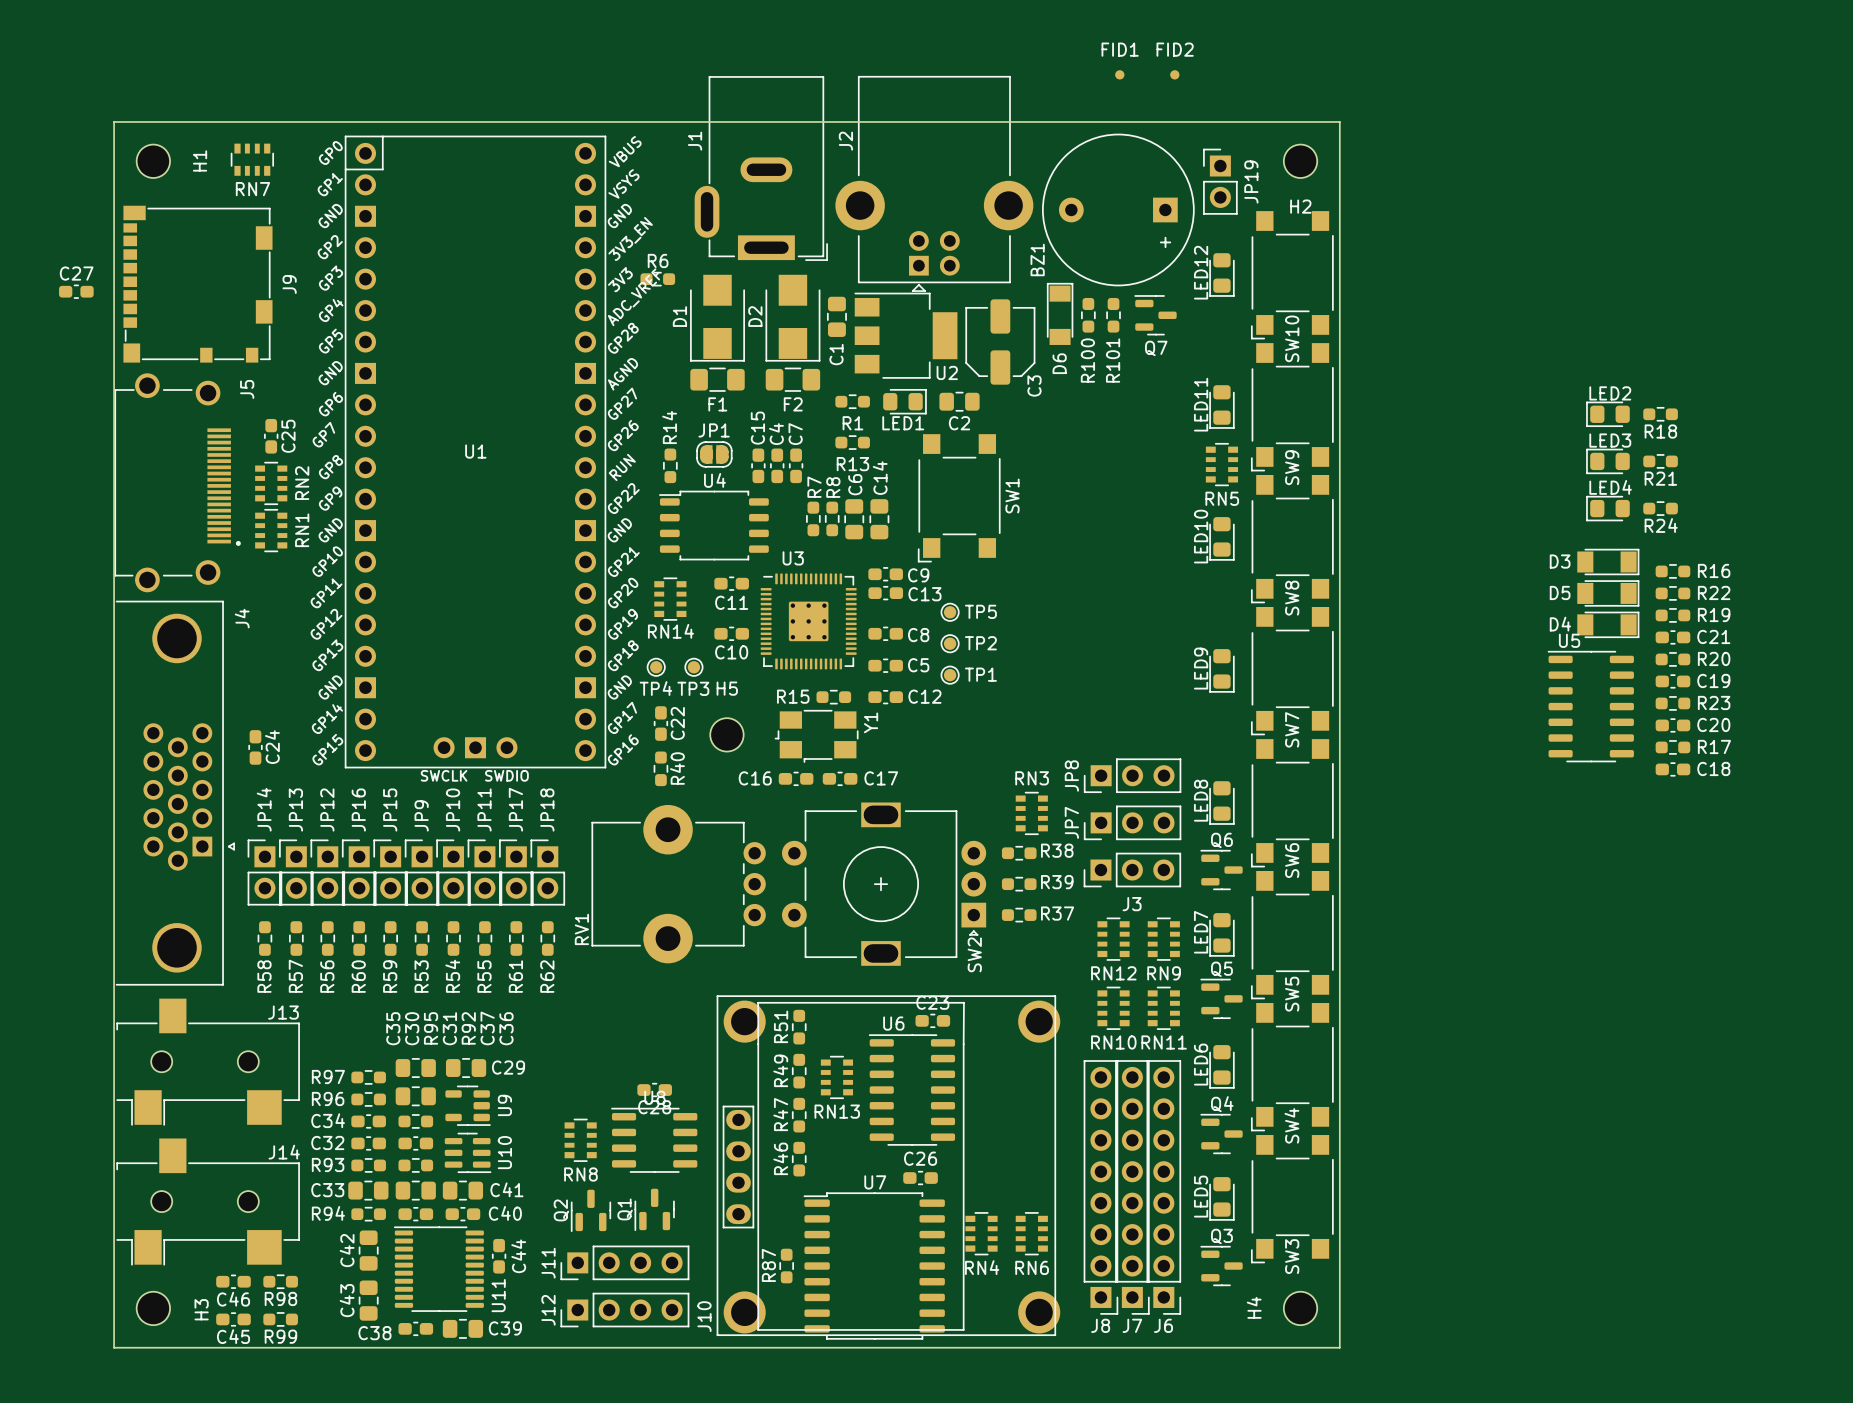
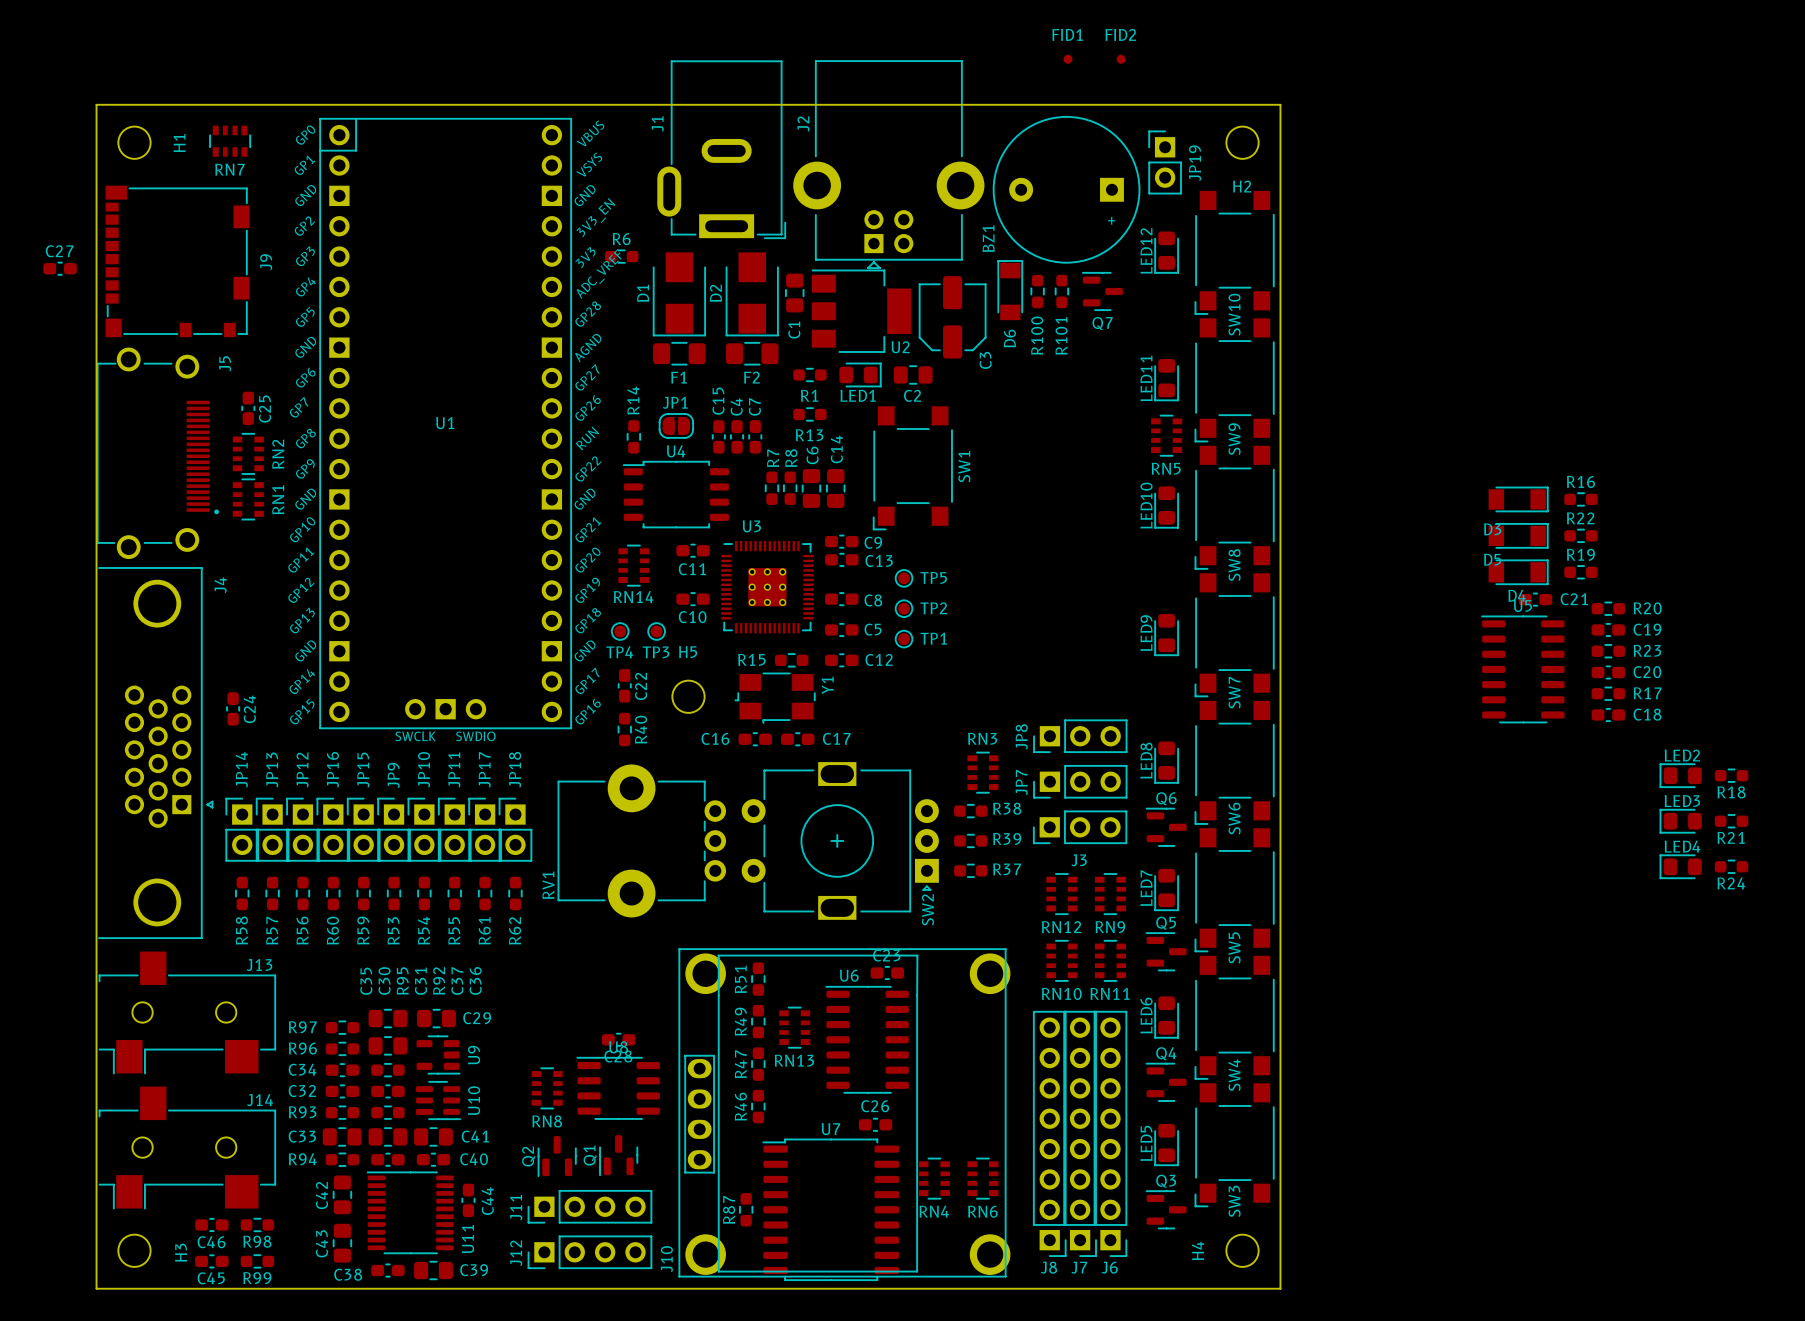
LED2 position: (1608, 414) -> (1680, 775)
R18 position: (1660, 414) -> (1731, 775)
LED3 position: (1608, 461) -> (1680, 821)
R21 position: (1660, 461) -> (1731, 821)
LED4 position: (1608, 508) -> (1680, 866)
R24 position: (1660, 508) -> (1731, 866)
D3 position: (1608, 562) -> (1518, 499)
R16 name position: R16 (1714, 570) -> R16 (1580, 481)
R16 position: (1672, 571) -> (1581, 499)
R22 name position: R22 (1714, 592) -> R22 (1580, 518)
D5 position: (1608, 593) -> (1518, 535)
R22 position: (1672, 593) -> (1581, 535)
R19 name position: R19 (1714, 614) -> R19 (1580, 554)
R19 position: (1672, 615) -> (1581, 572)
D4 name position: D4 (1560, 624) -> D4 (1517, 595)
D4 position: (1608, 624) -> (1518, 572)
C21 position: (1672, 637) -> (1535, 599)
U5 name position: U5 (1569, 640) -> U5 (1522, 605)
R20 position: (1672, 659) -> (1608, 608)
C19 position: (1672, 681) -> (1608, 629)
R23 position: (1672, 703) -> (1608, 651)
C20 position: (1672, 725) -> (1608, 672)
R17 position: (1672, 747) -> (1608, 693)
C18 position: (1672, 769) -> (1608, 714)

